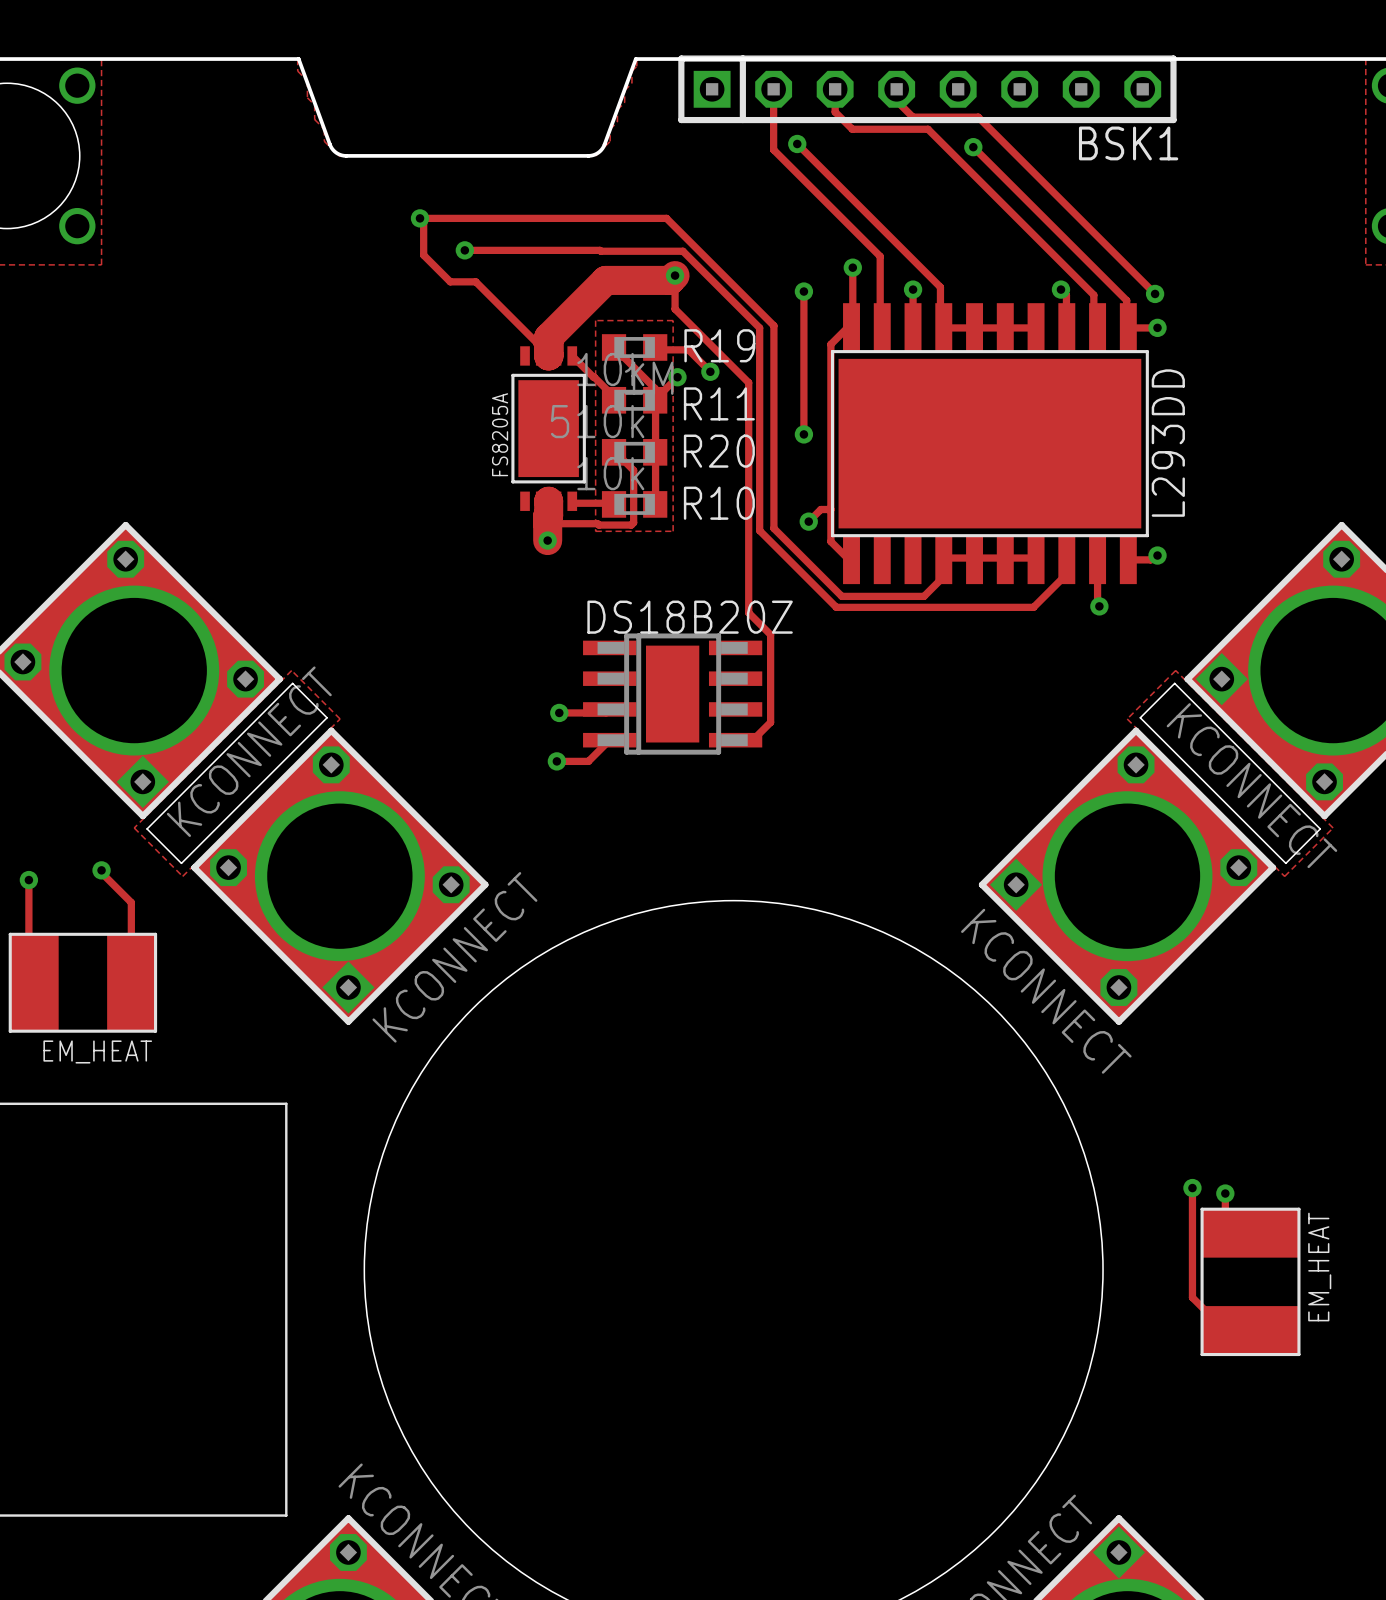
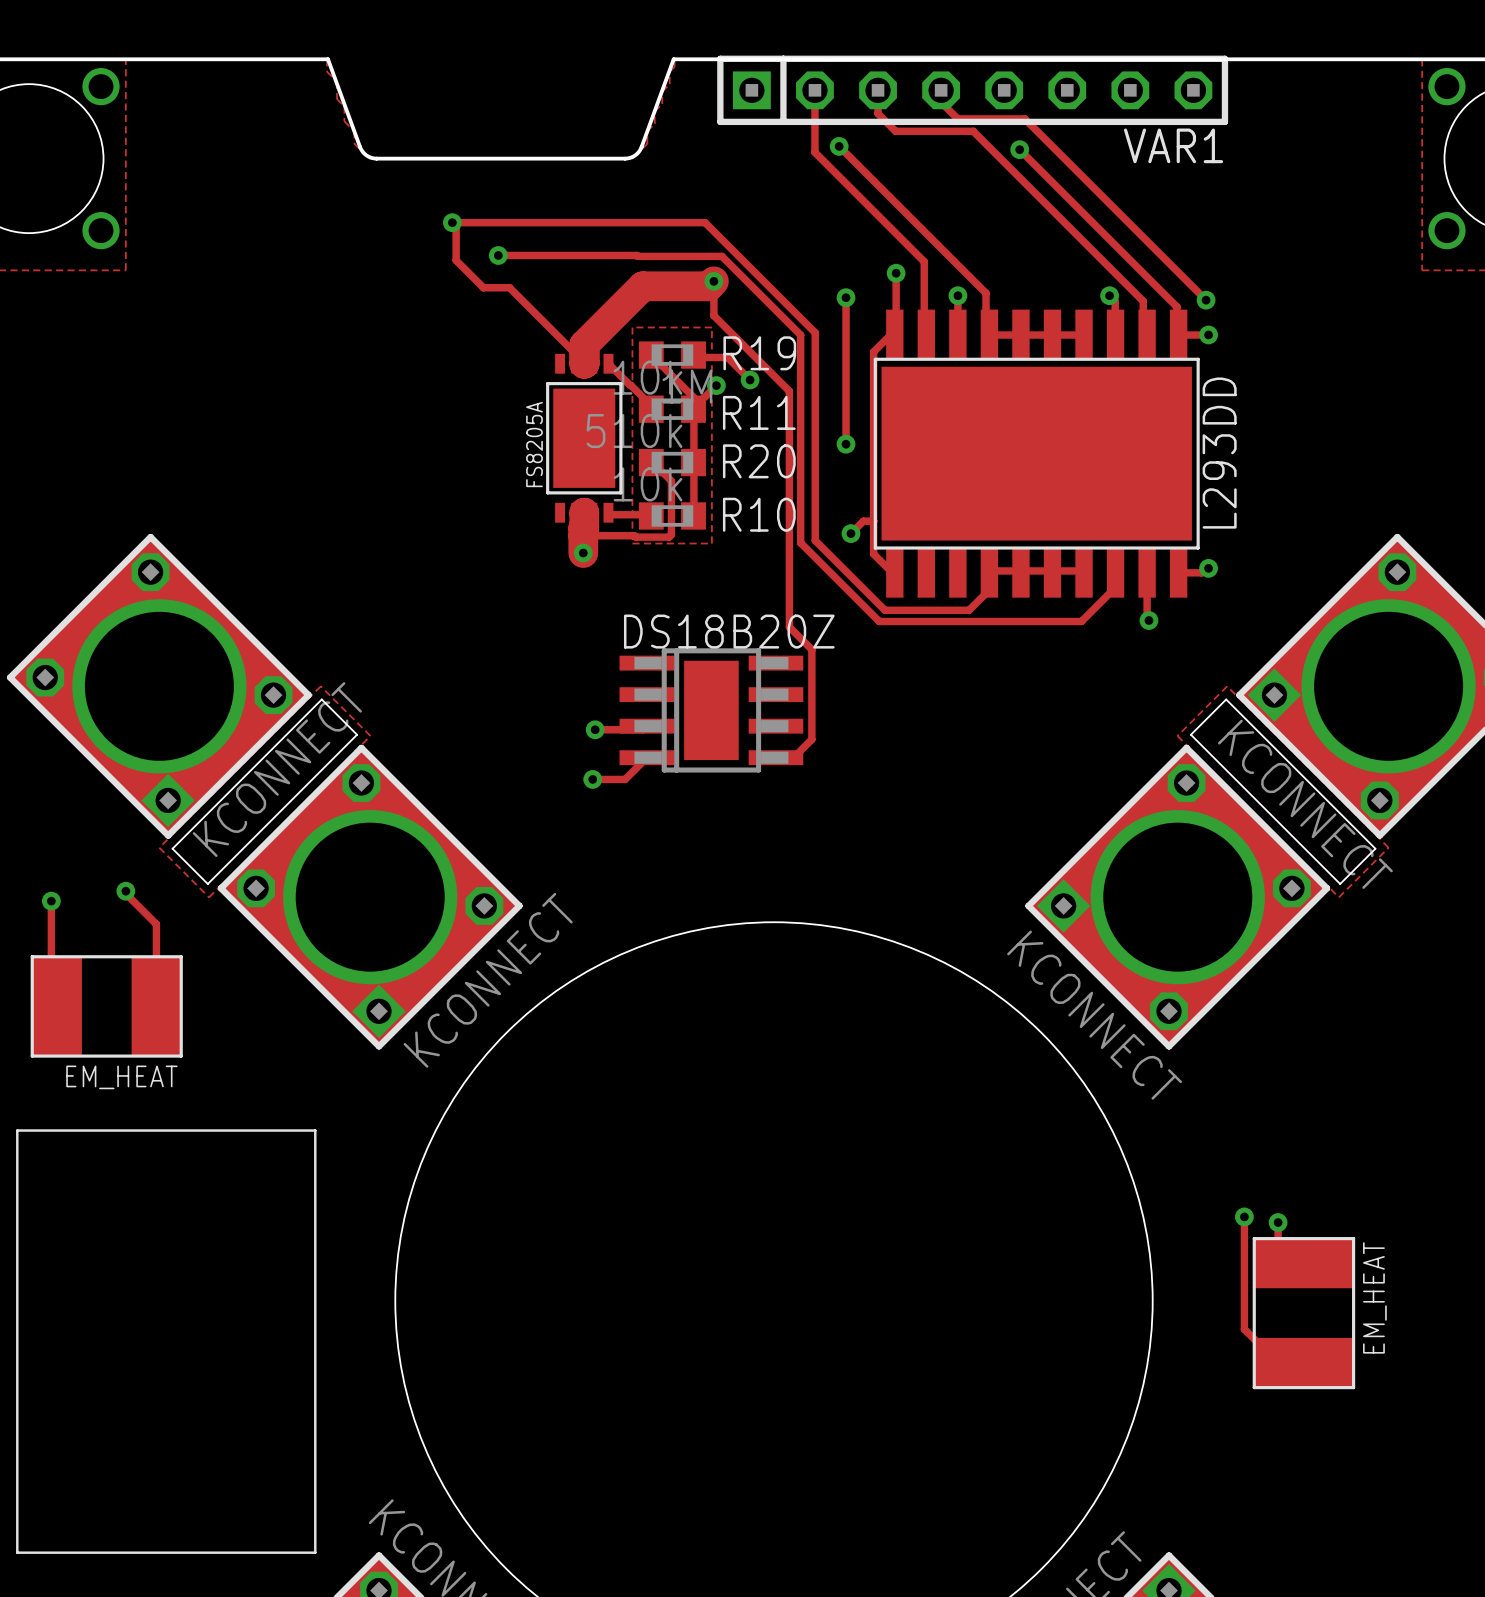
BSK1 name: BSK1 (1128, 143) -> VAR1 (1173, 145)

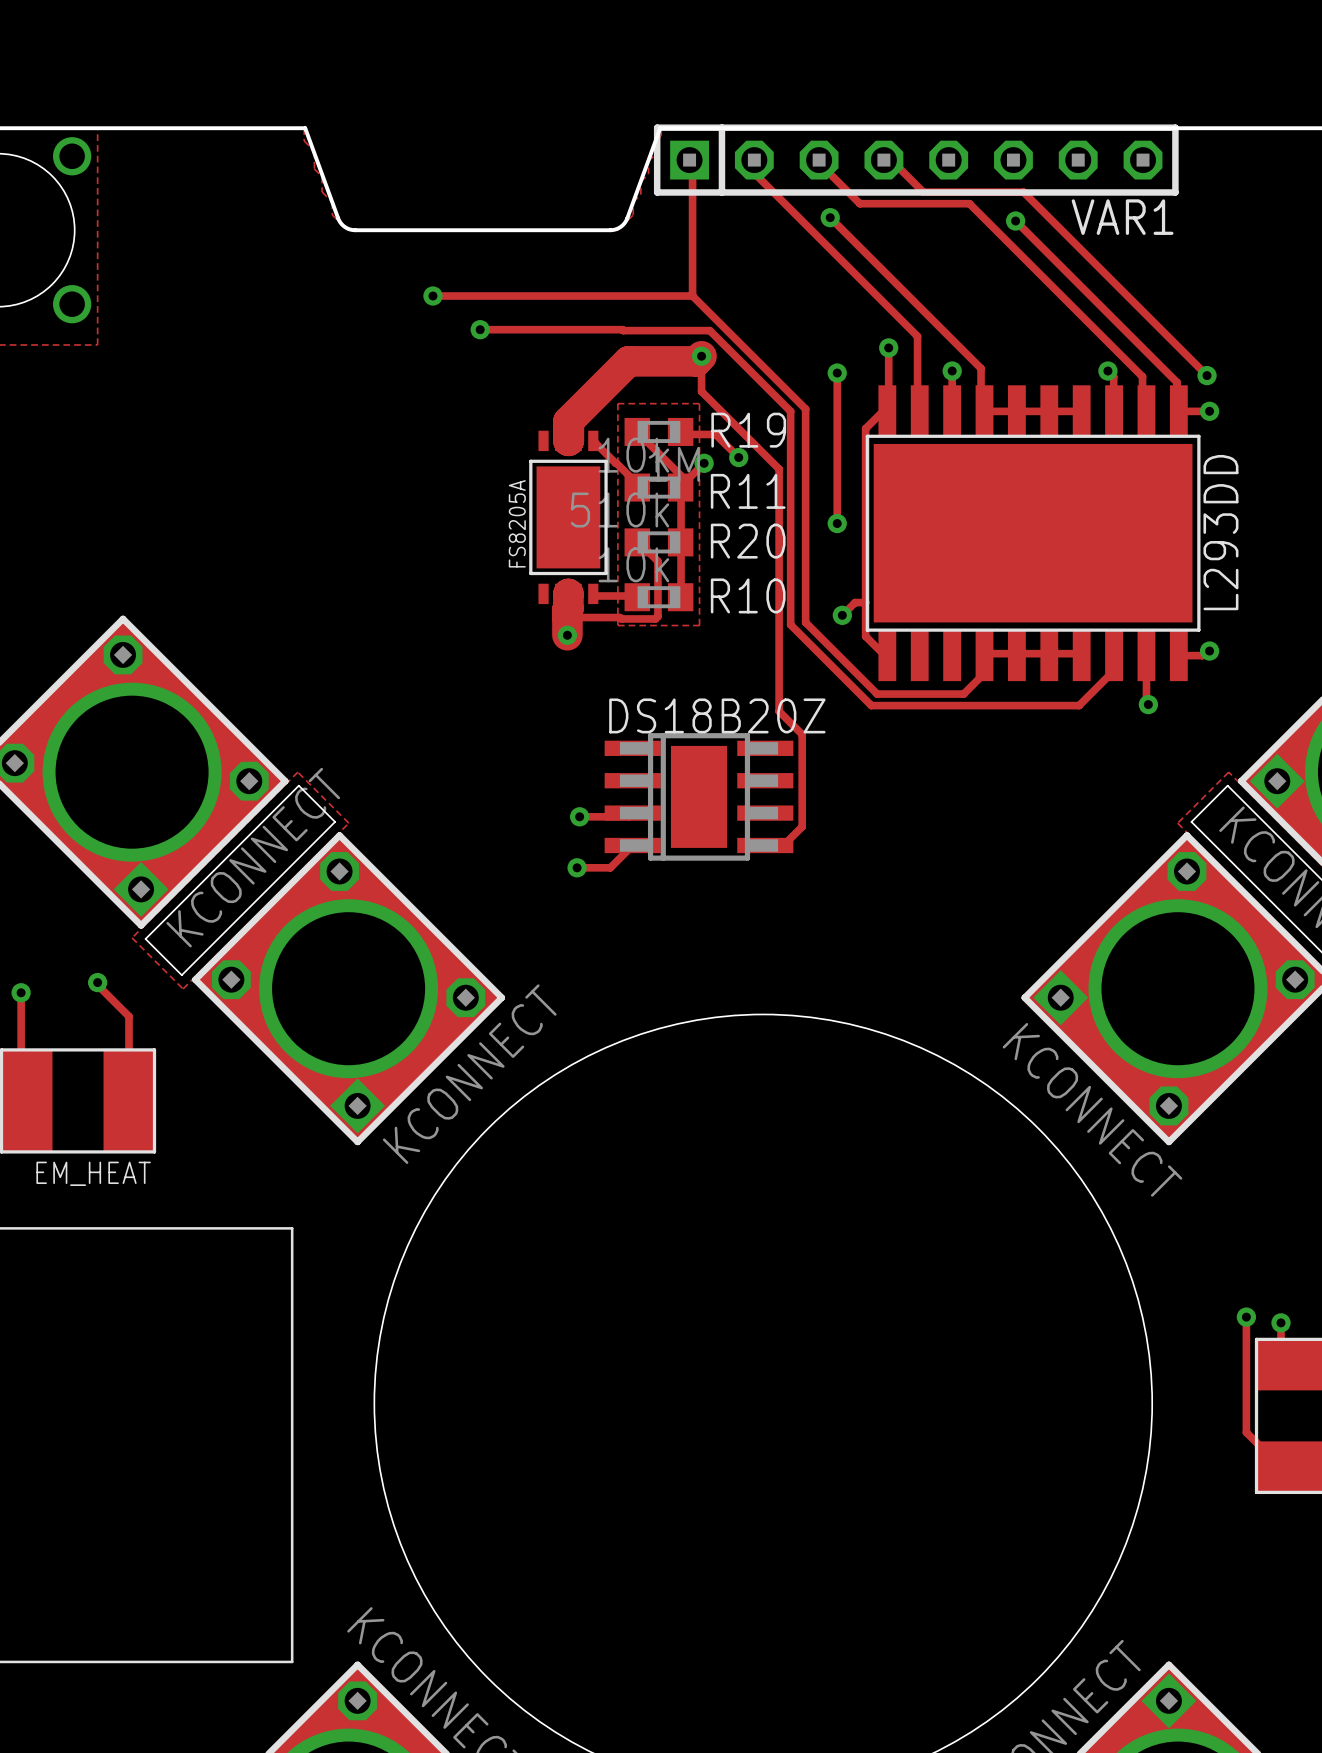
track: none -> (689, 160) (692, 163) (692, 296)
track: (814, 90) (814, 152) (924, 261) -> (754, 160) (756, 174) (917, 336)
track: (878, 90) (878, 113) (895, 131) (974, 132) -> (819, 160) (819, 163) (859, 203) (969, 203)
track: (941, 90) (941, 102) (957, 118) (1024, 118) (1027, 121) -> (883, 160) (888, 157) (923, 192) (1023, 192)
VAR1 position: (972, 90) -> (916, 160)
track: (456, 222) (456, 260) (483, 287) (509, 287) (584, 363) -> none

